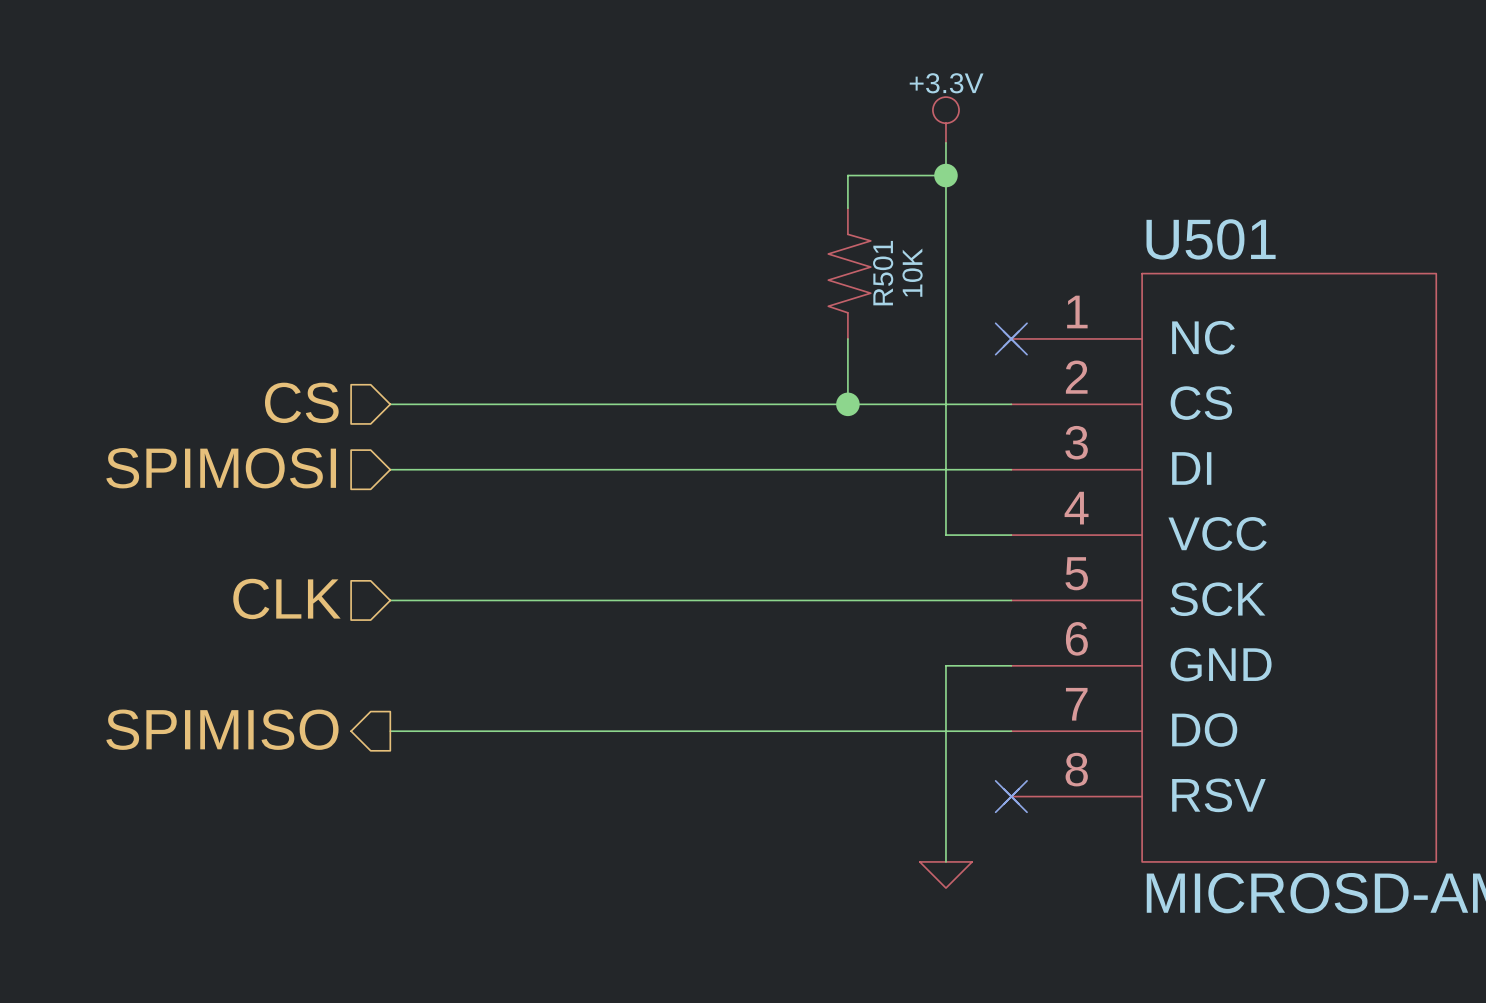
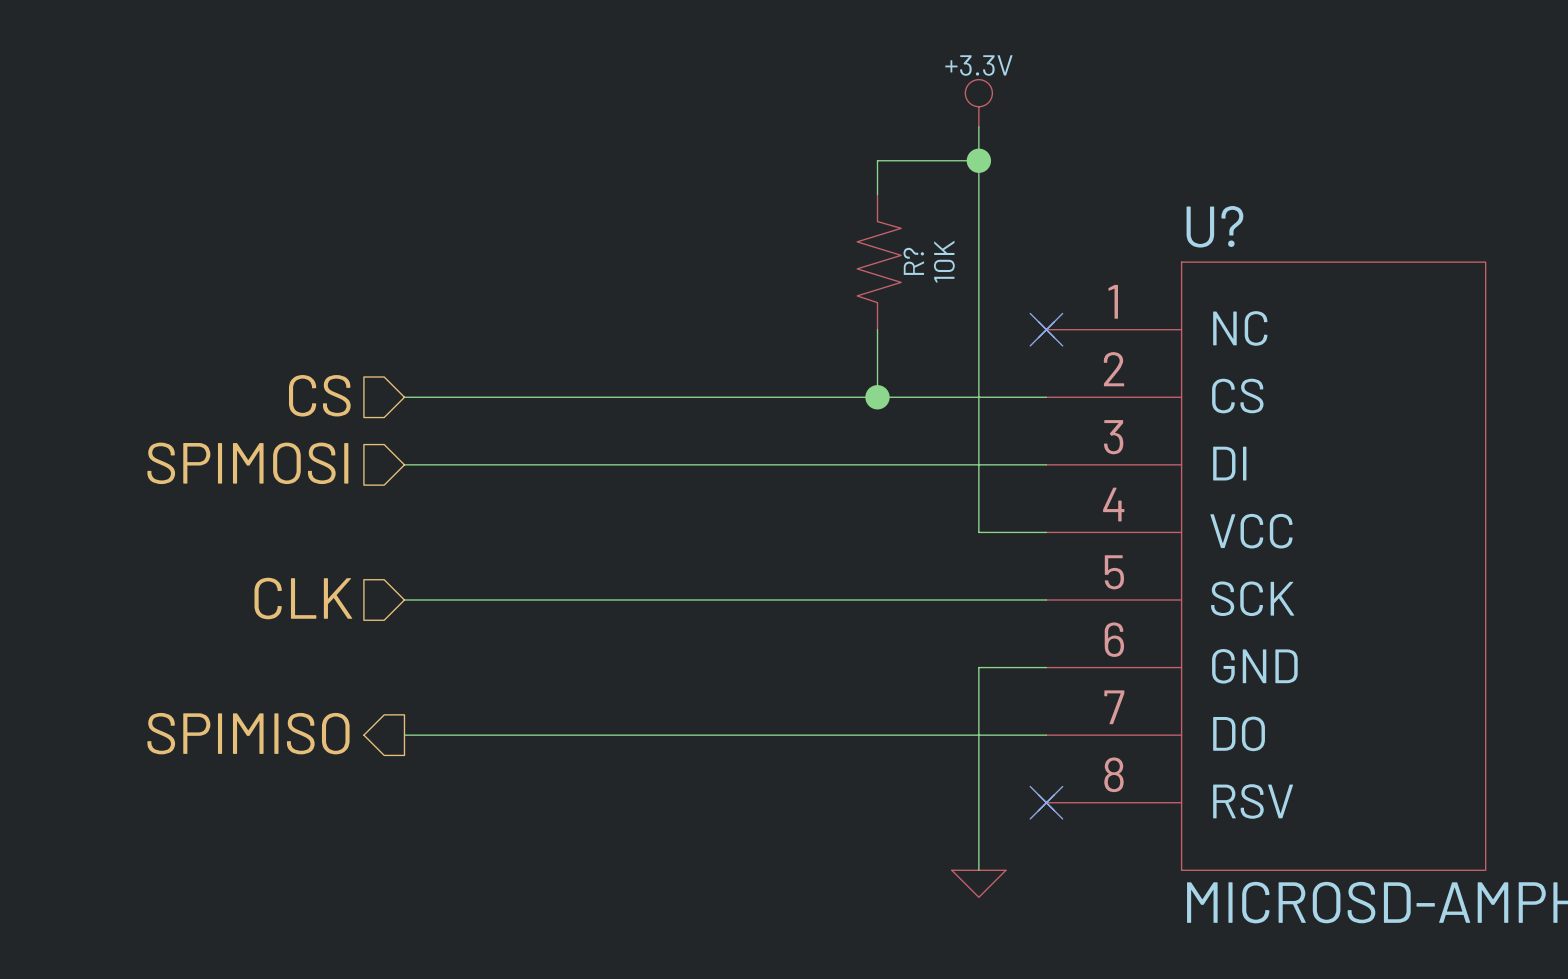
U501 name: U501 (1211, 239) -> U? (1214, 226)
R501 name: R501 (883, 273) -> R? (913, 261)

